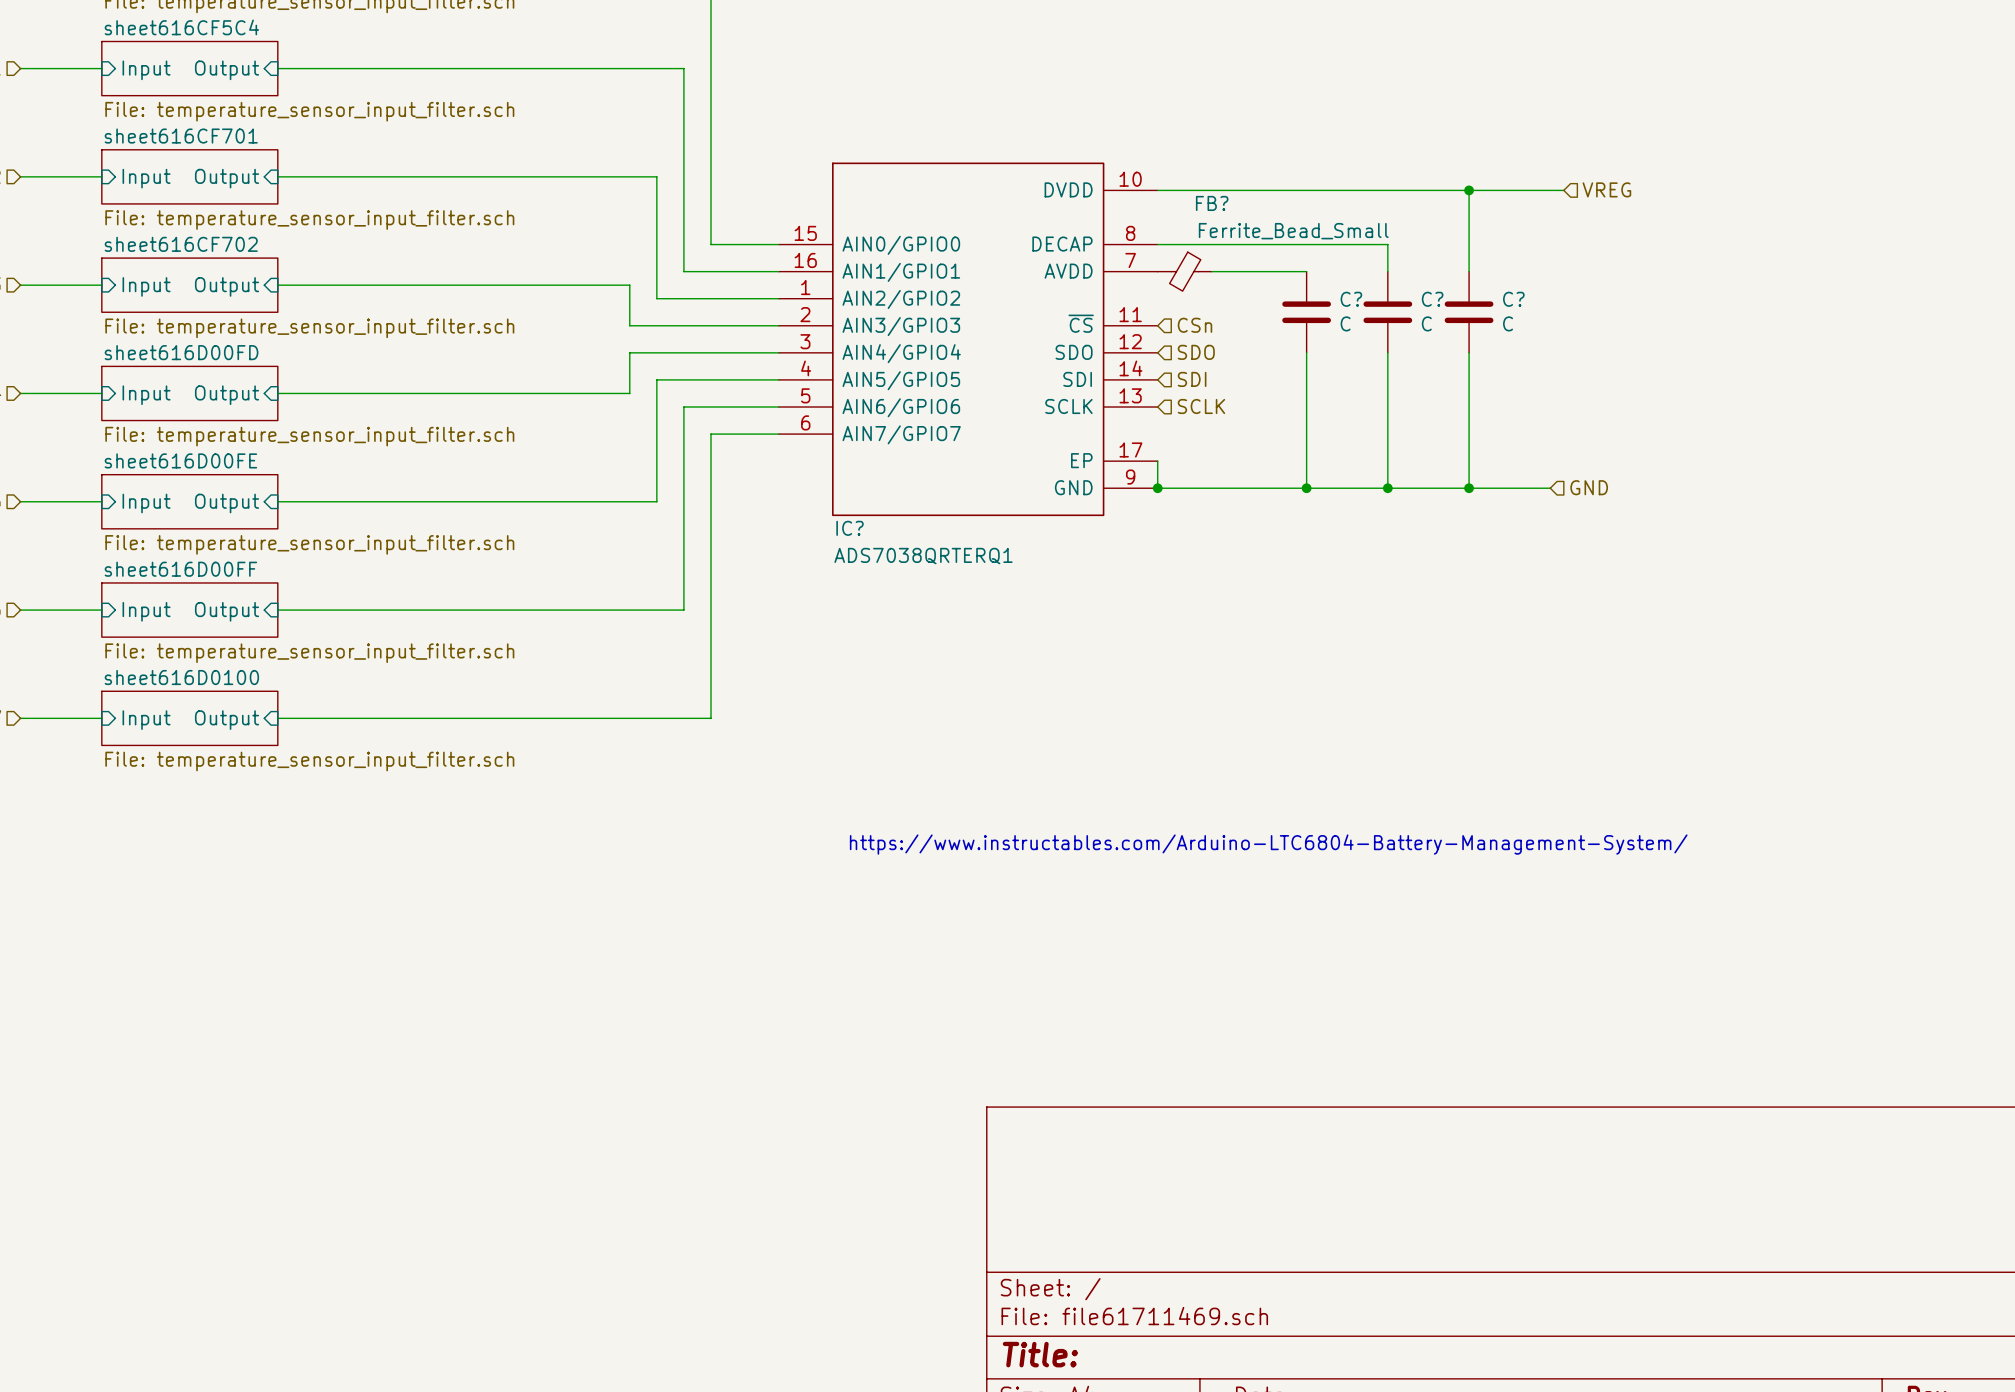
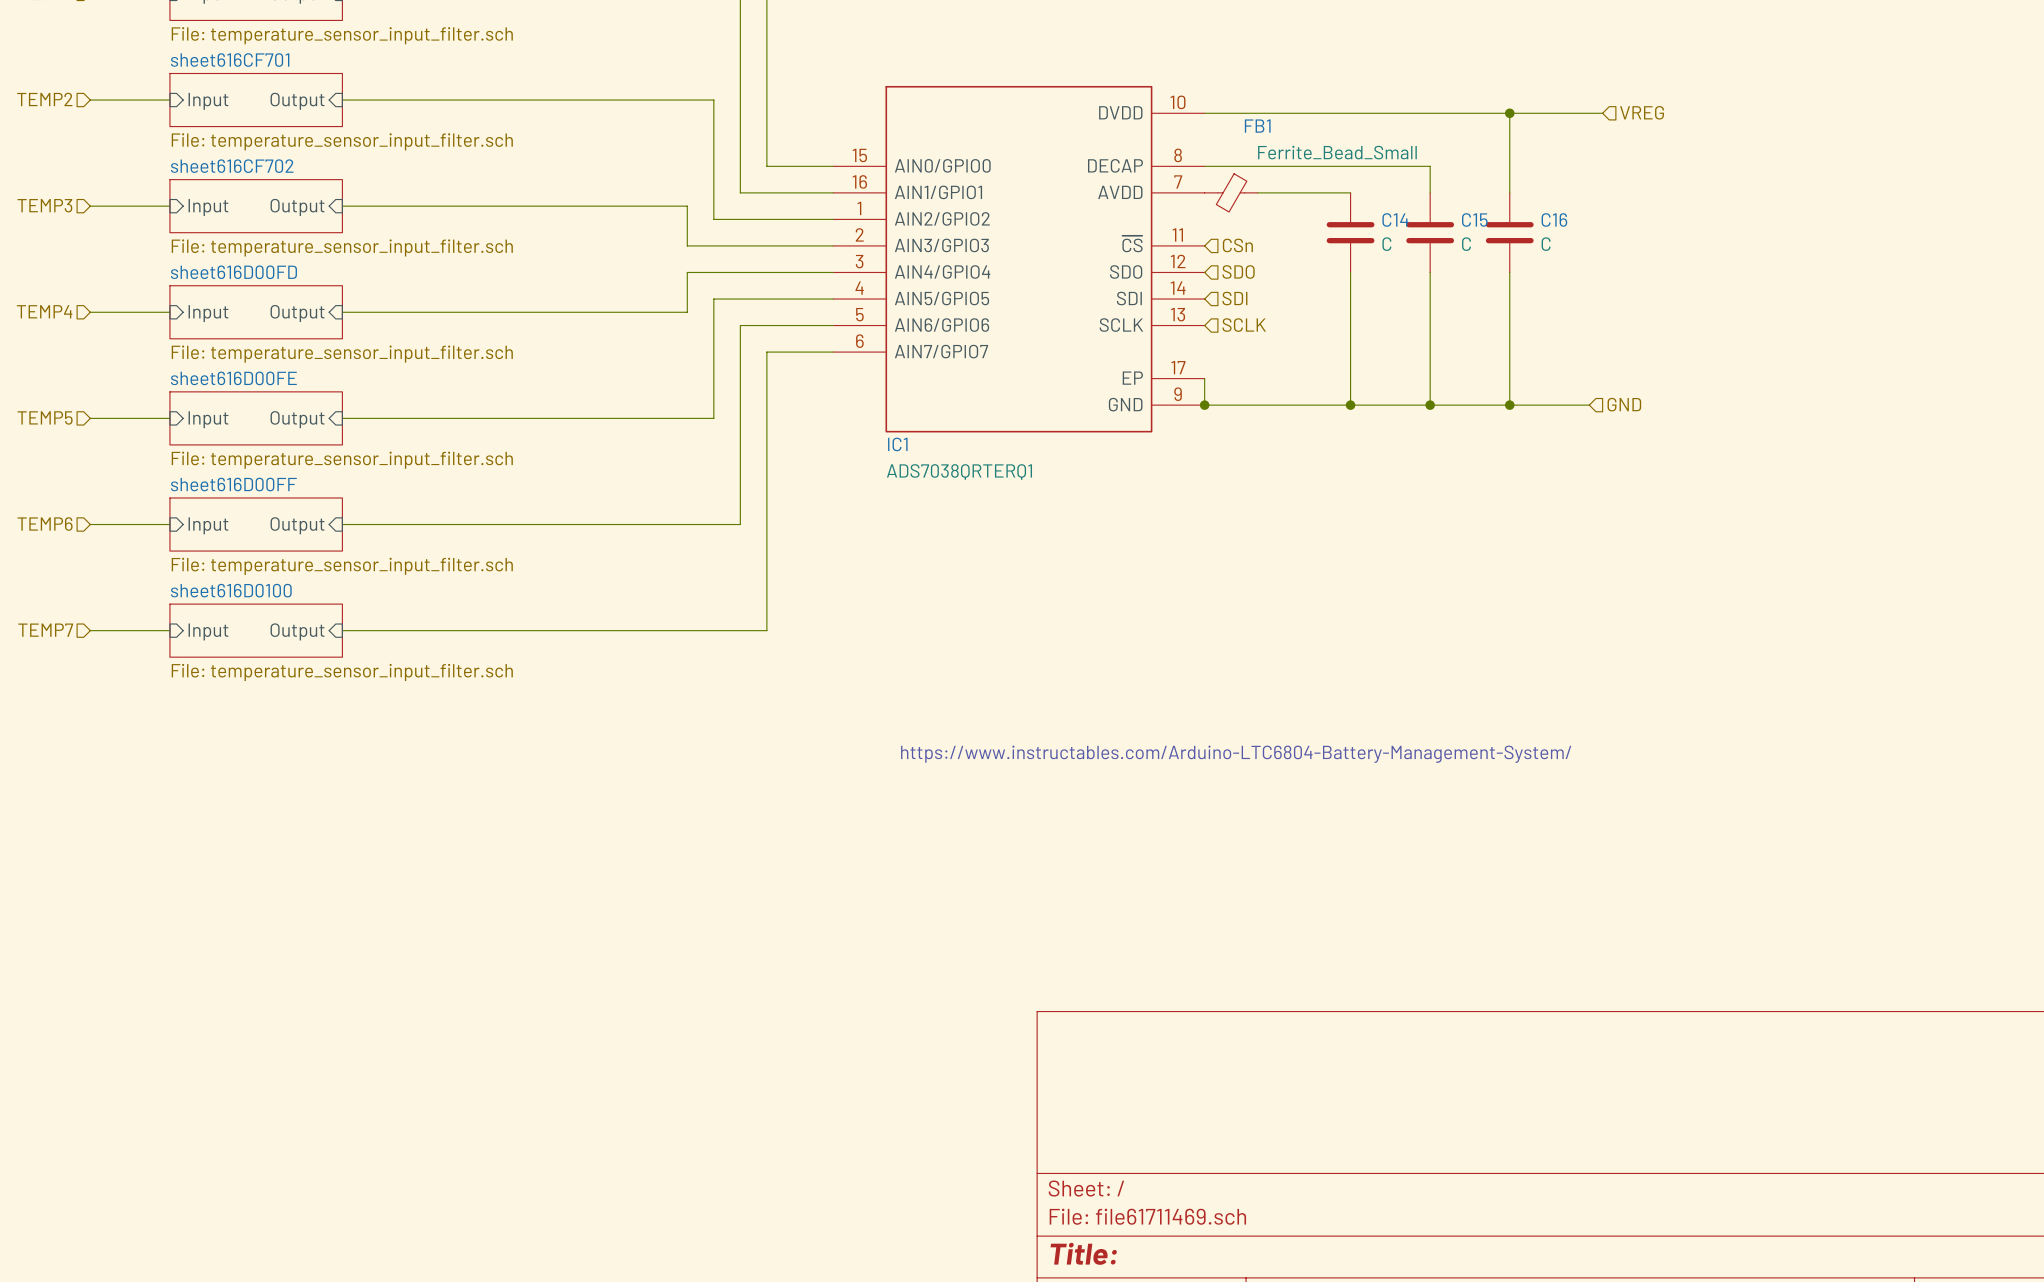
FB? name: FB? (1212, 203) -> FB1 (1257, 126)
C? name: C? (1351, 299) -> C14 (1395, 219)
C? name: C? (1432, 299) -> C15 (1474, 219)
C? name: C? (1513, 299) -> C16 (1554, 219)
IC? name: IC? (850, 528) -> IC1 (897, 444)

